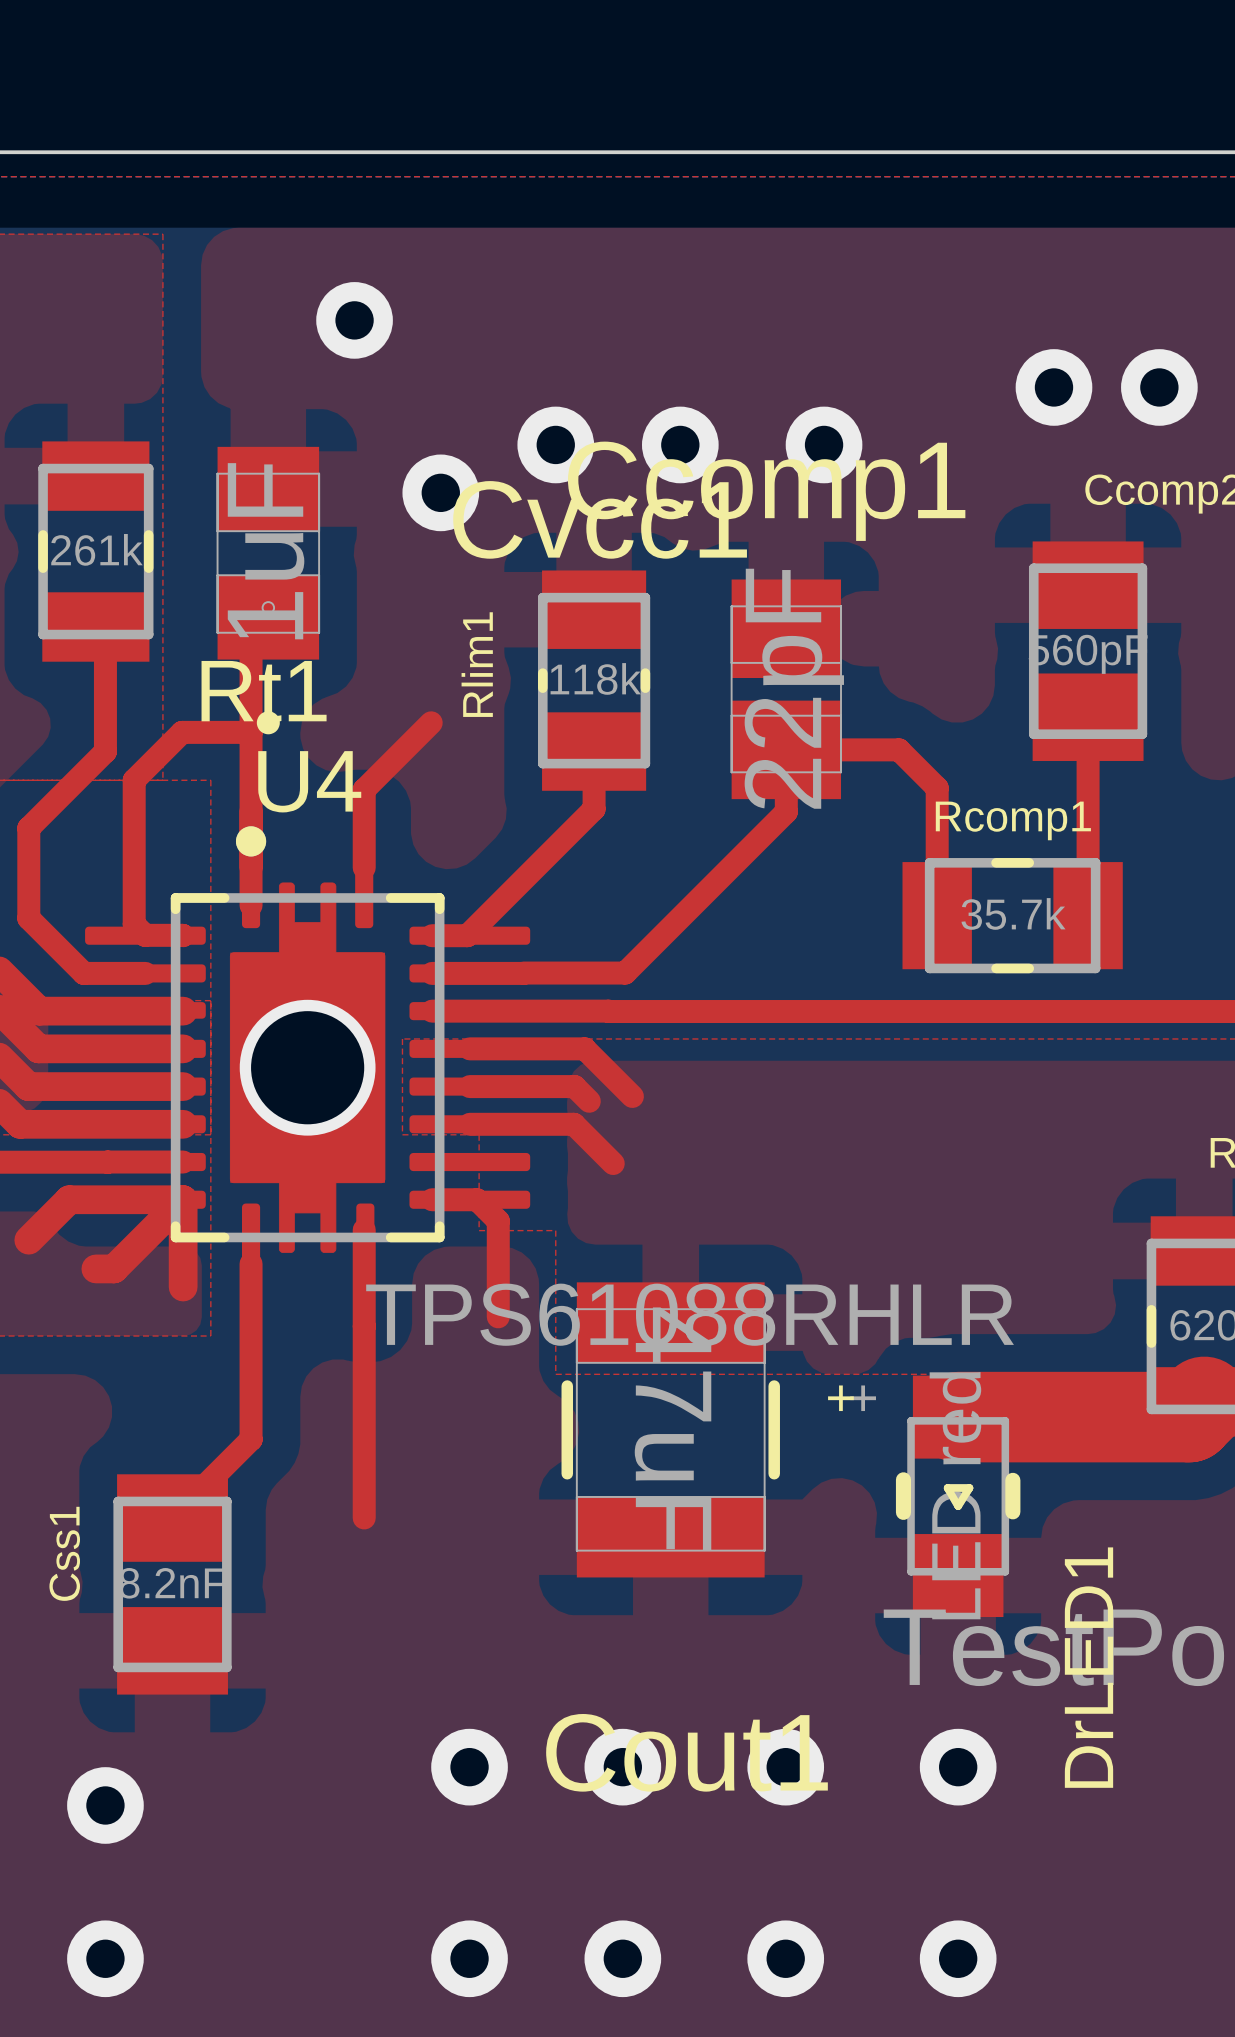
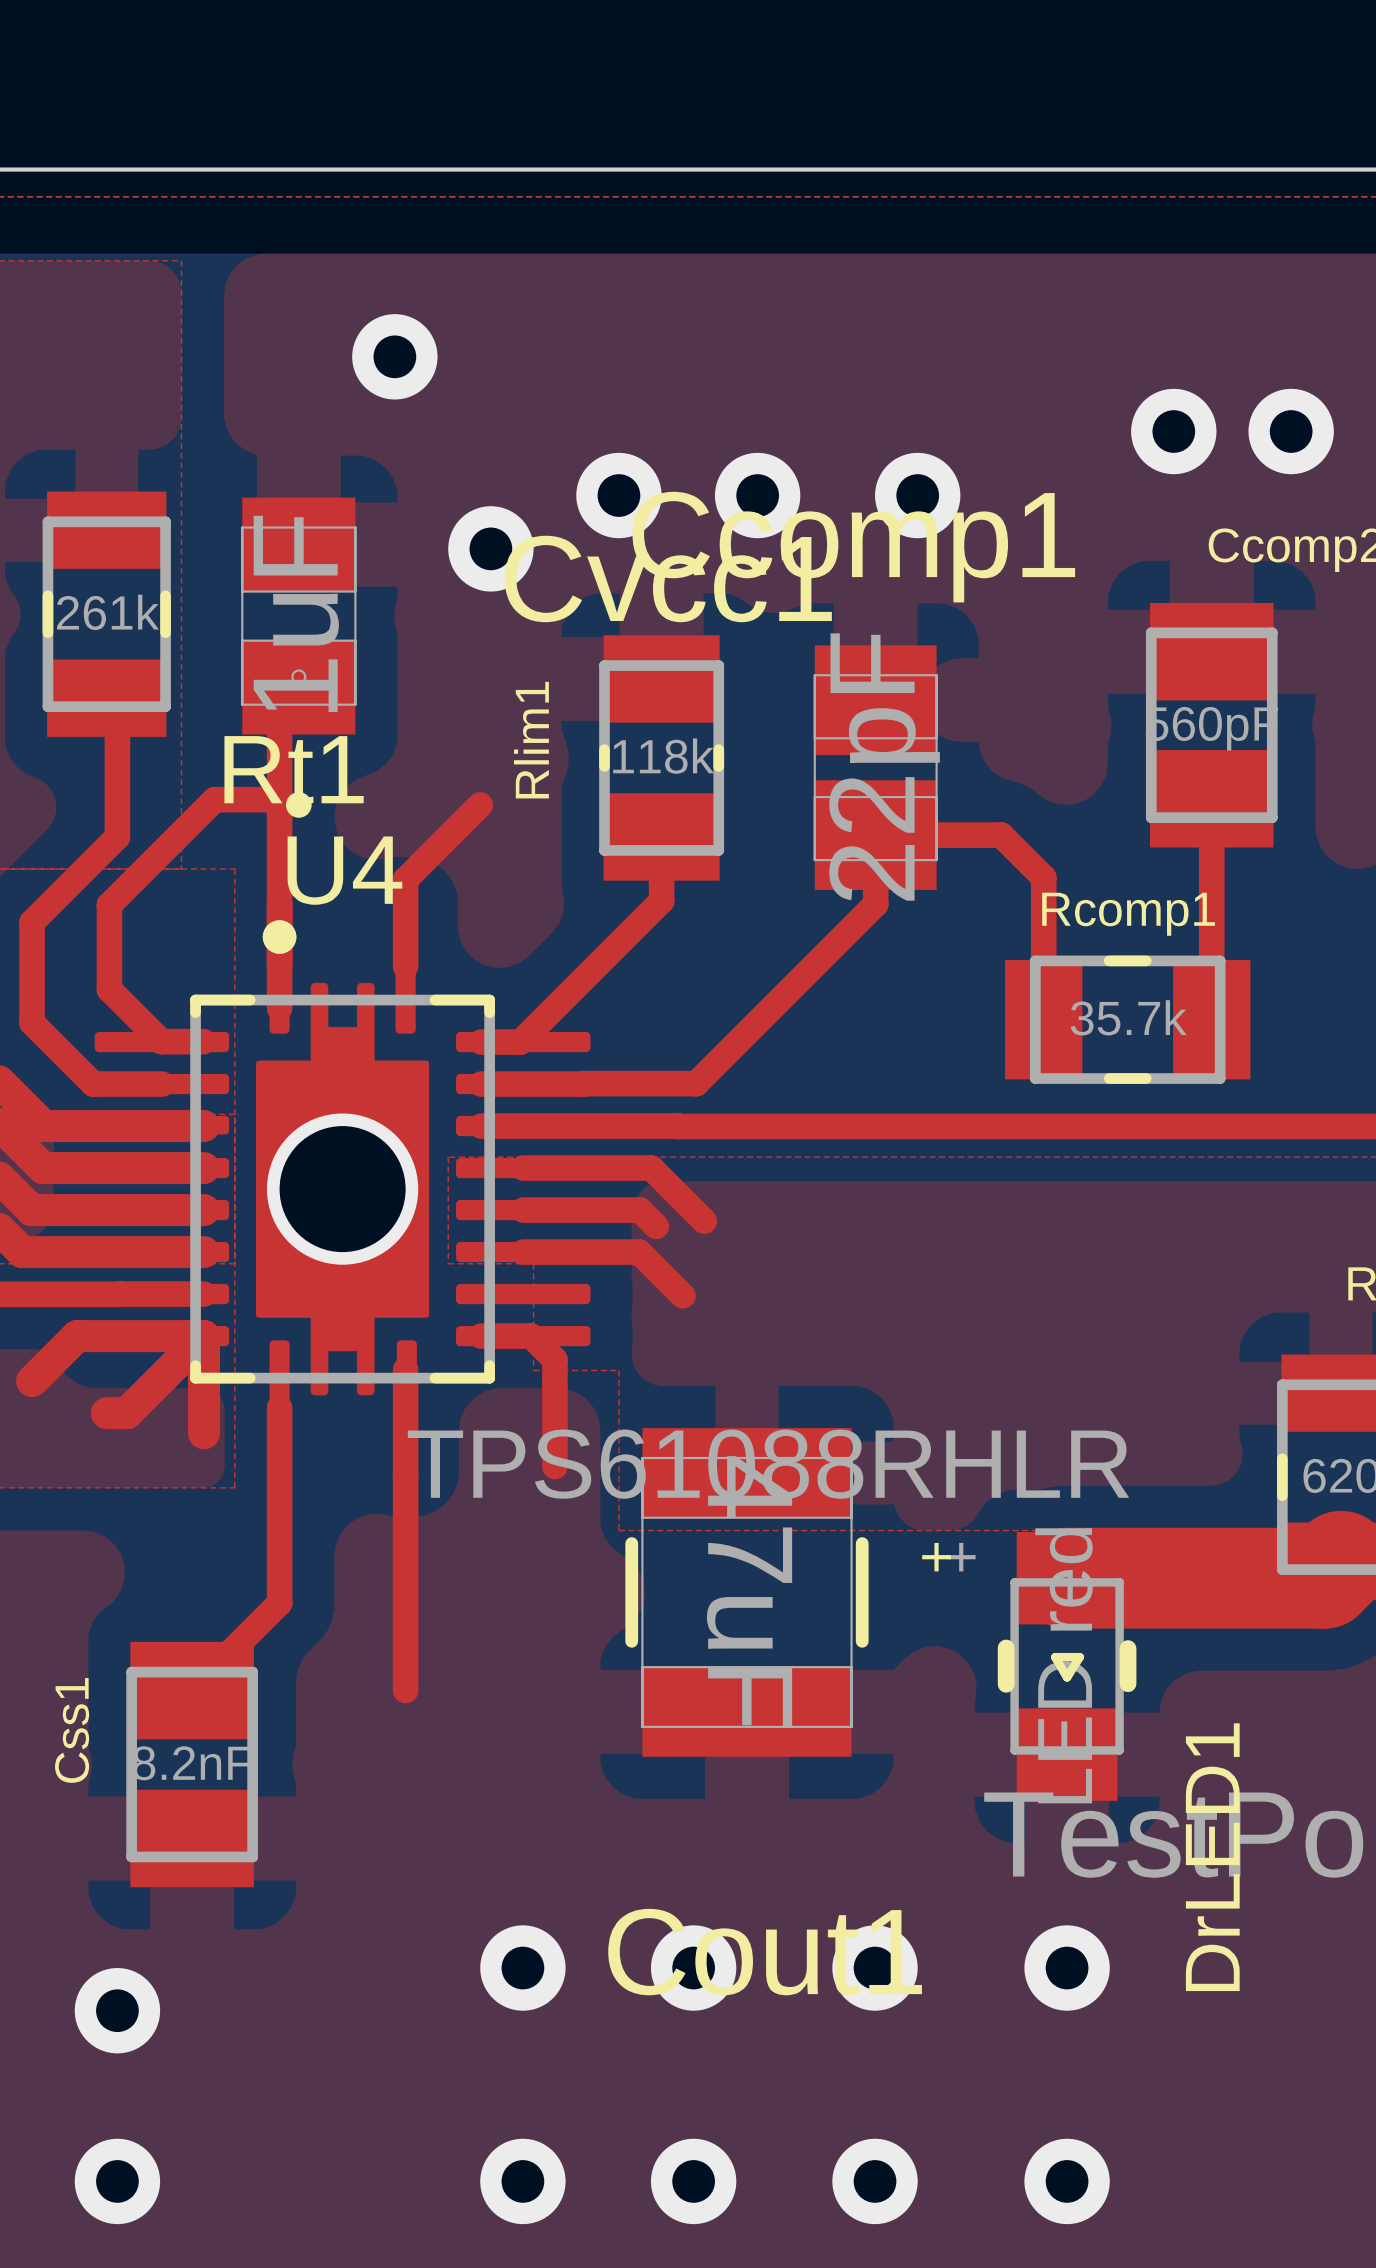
top track: (251, 732) (182, 732) (134, 780) (134, 924) -> (279, 799) (214, 799) (109, 904) (109, 989) (149, 1029)

